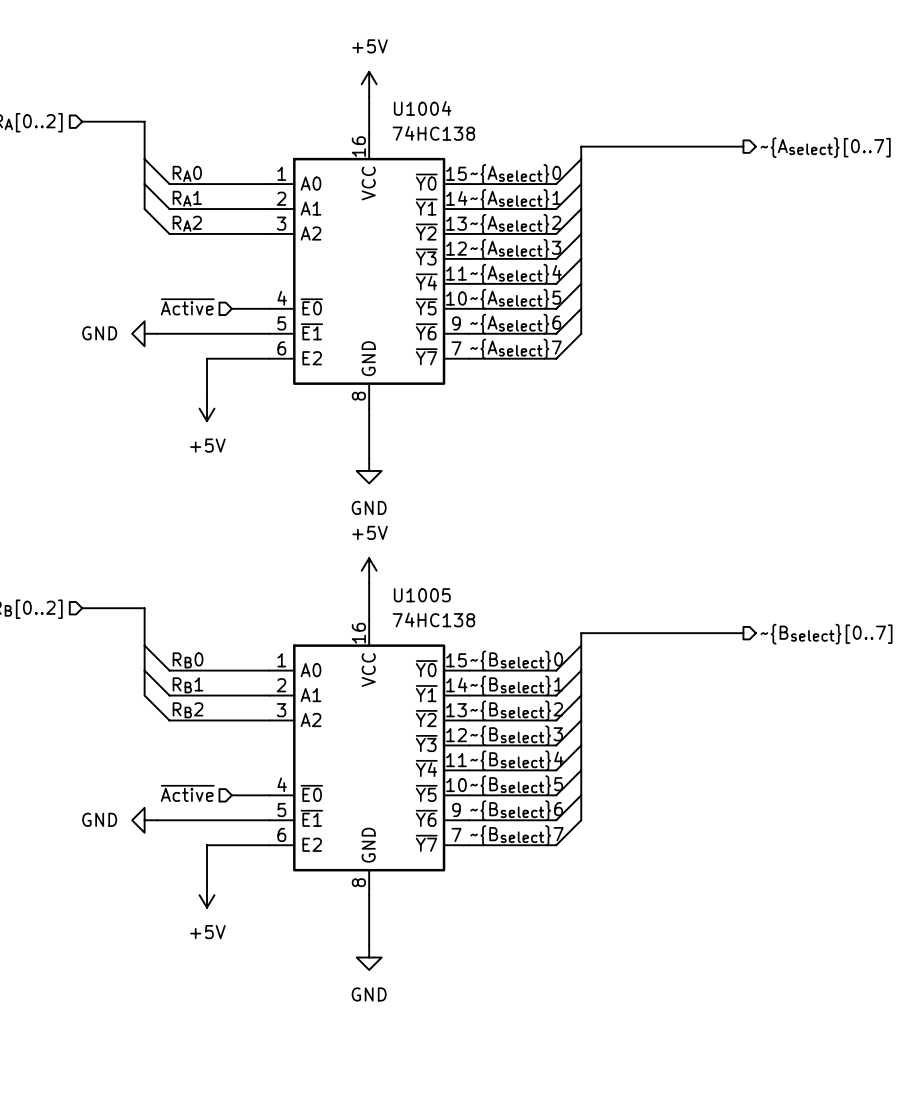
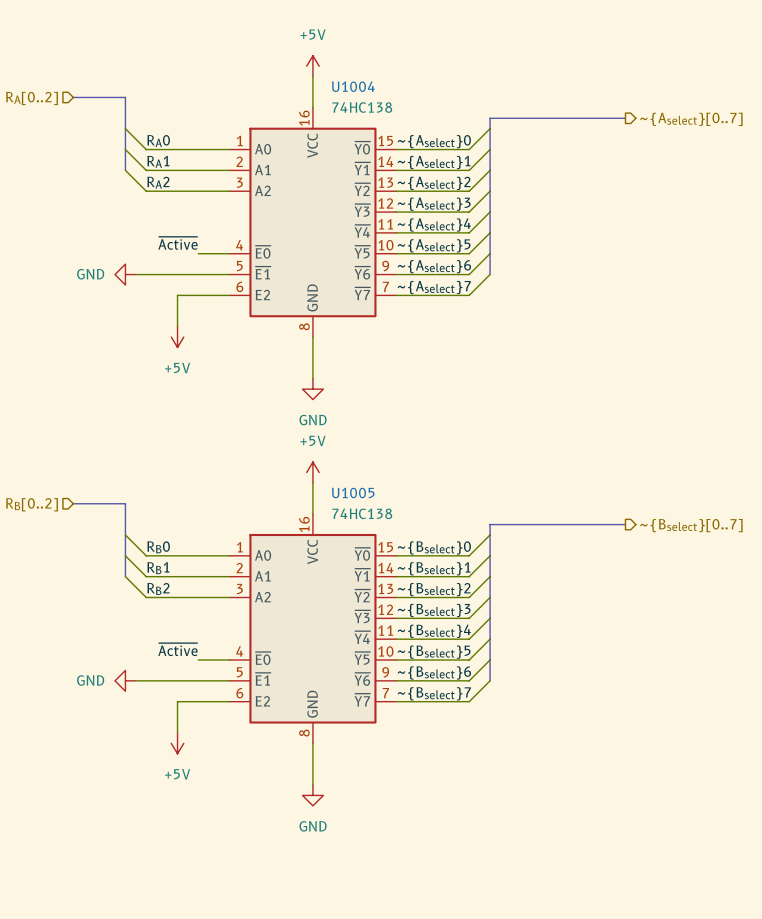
label: none -> ~{Active} (177, 243)
hierarchical label: ~{Active} (187, 306) -> none
label: none -> ~{Active} (177, 649)
hierarchical label: ~{Active} (187, 793) -> none

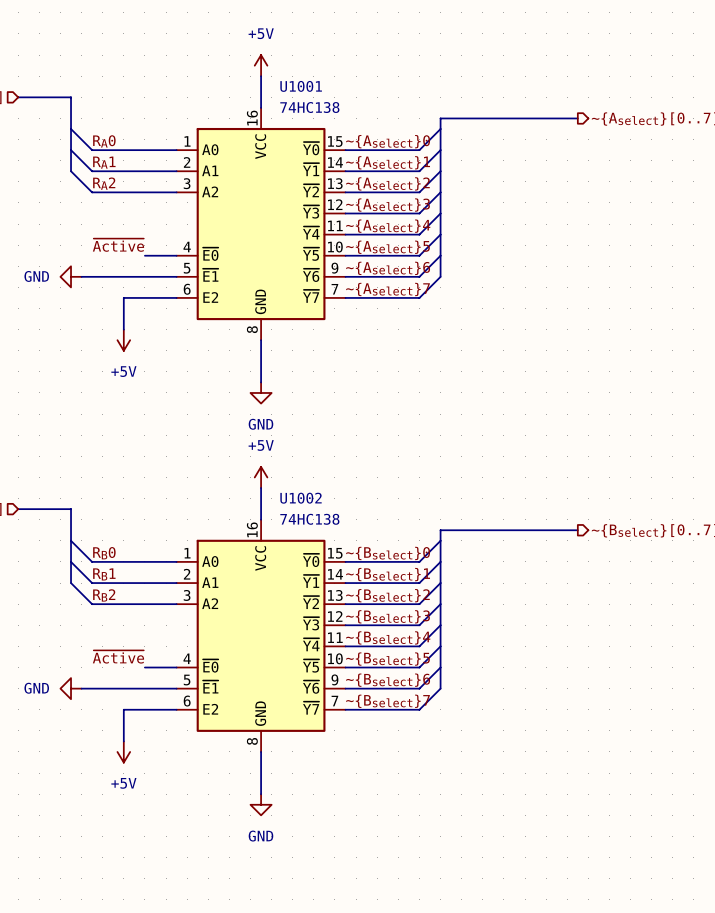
U1004 name: U1004 (353, 86) -> U1001 (301, 86)
U1005 name: U1005 (353, 492) -> U1002 (301, 498)

